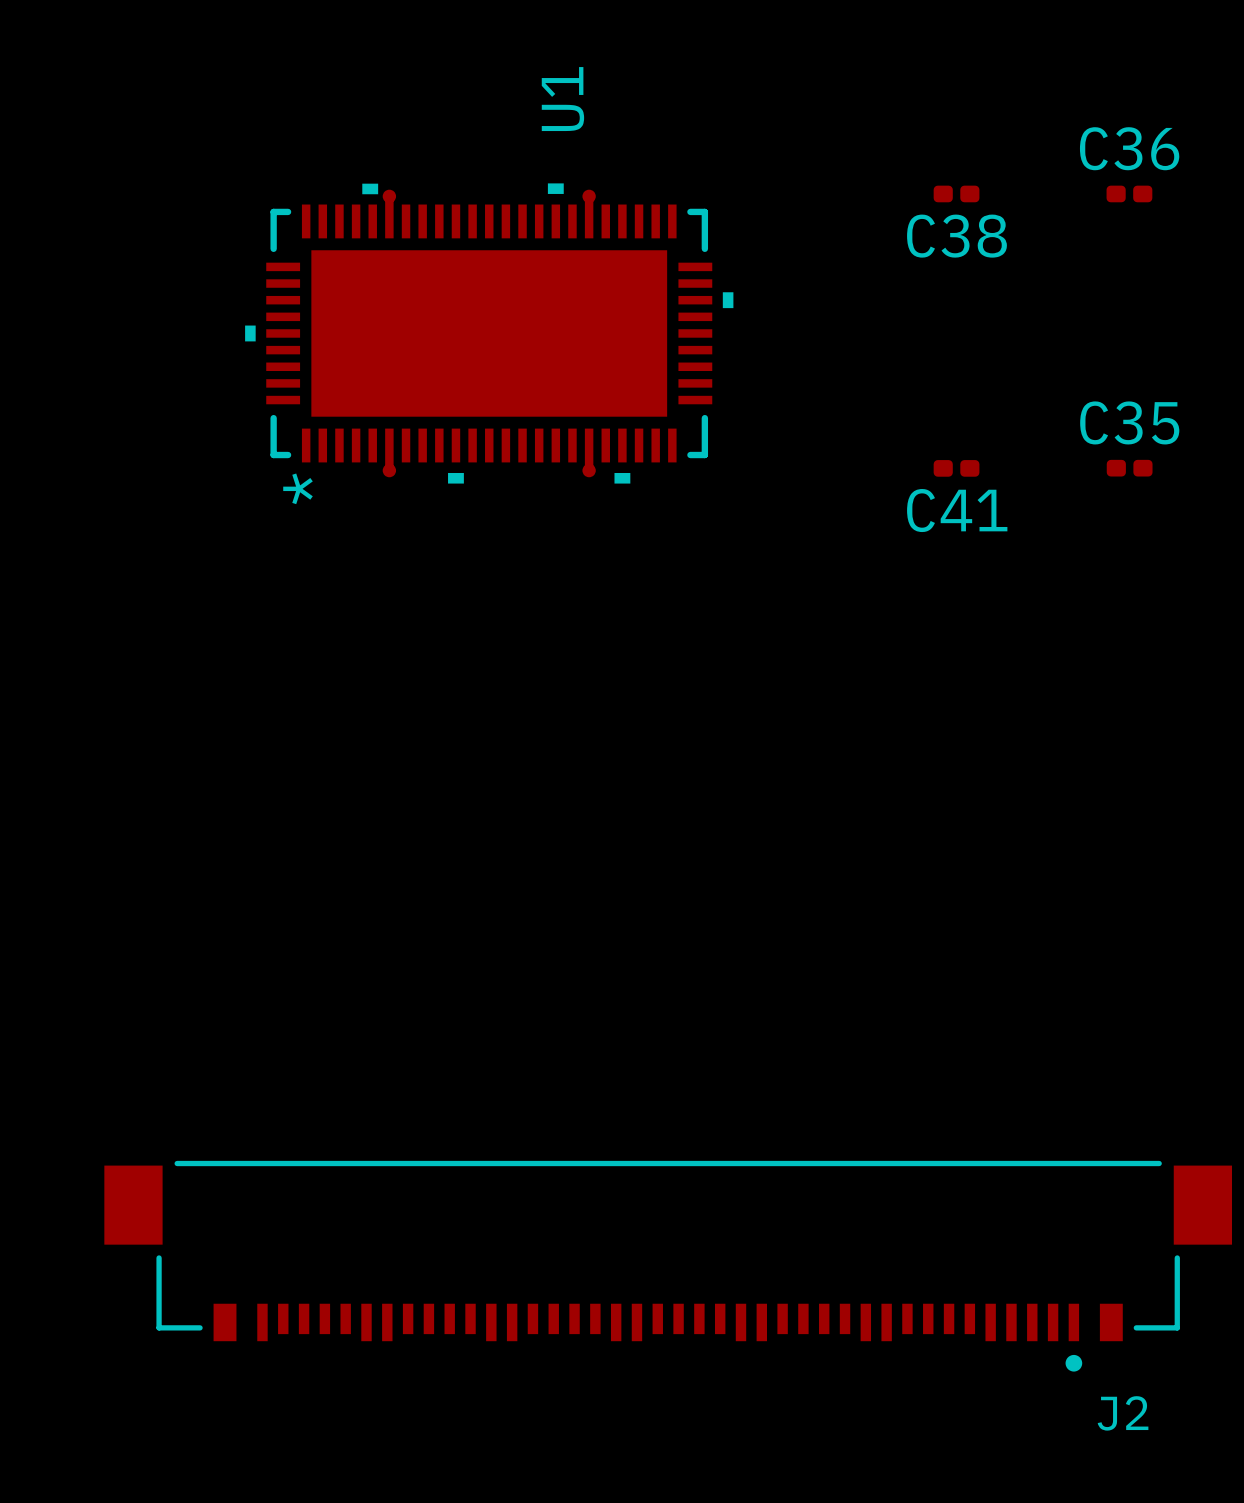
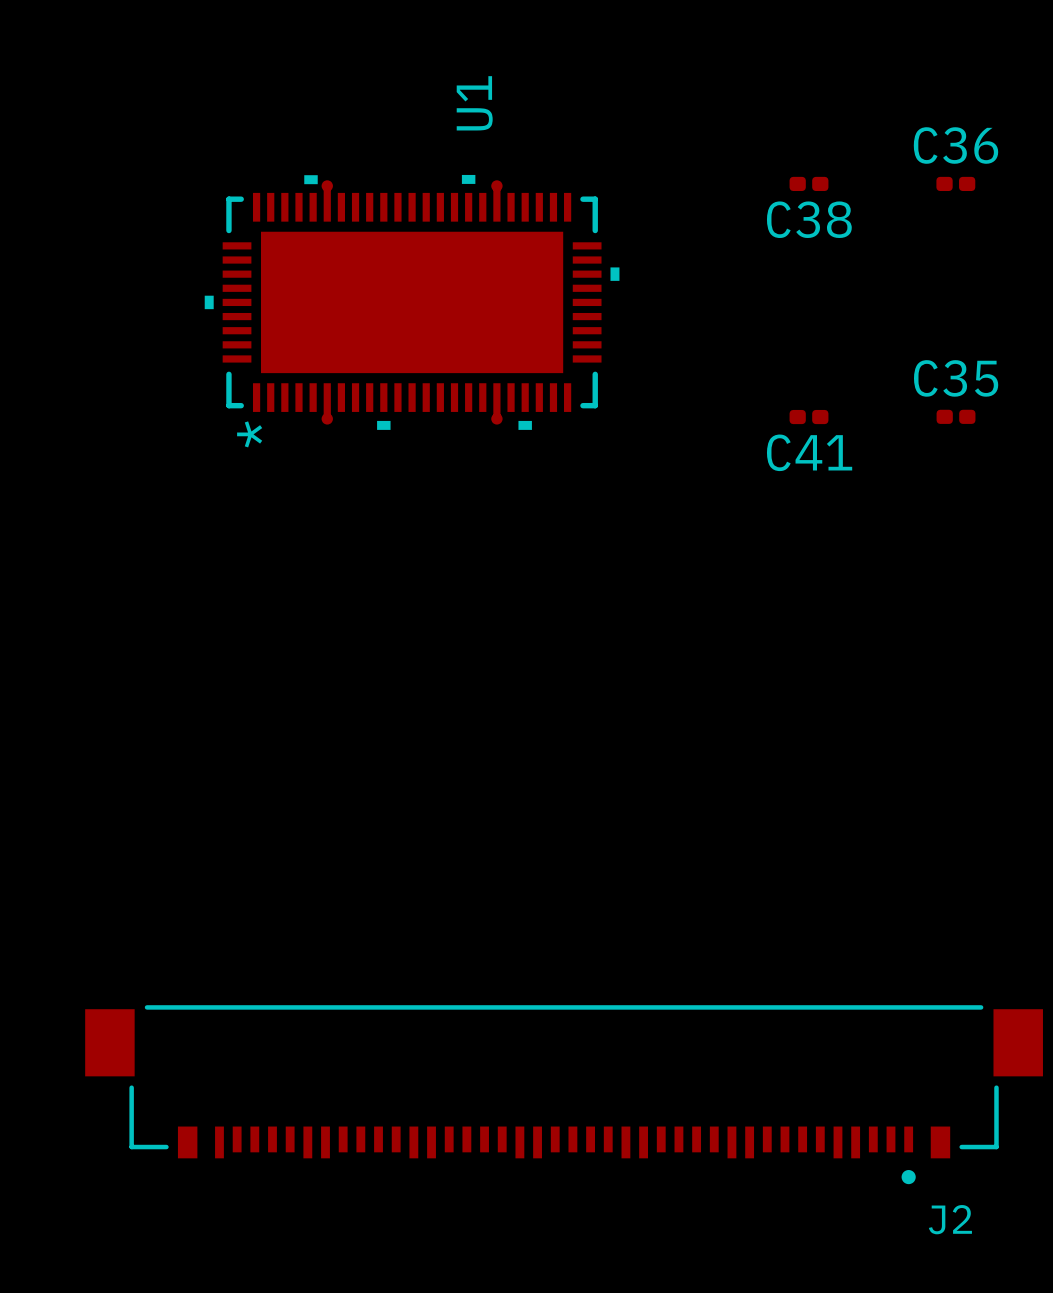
J2 footprint: [104, 1160, 1233, 1372] -> [85, 1005, 1043, 1185]

